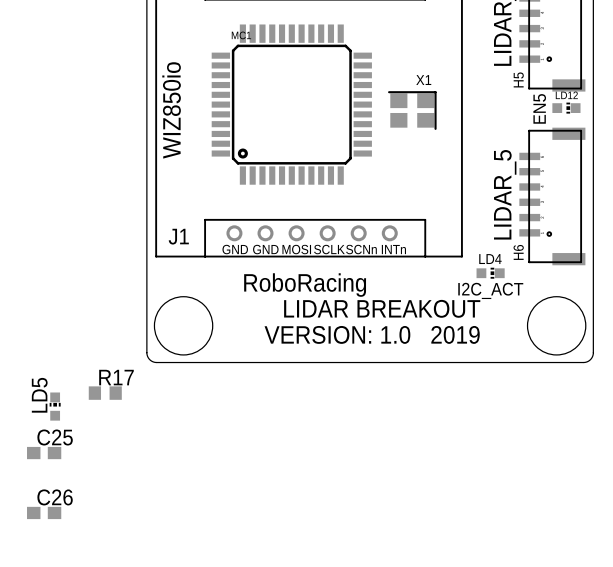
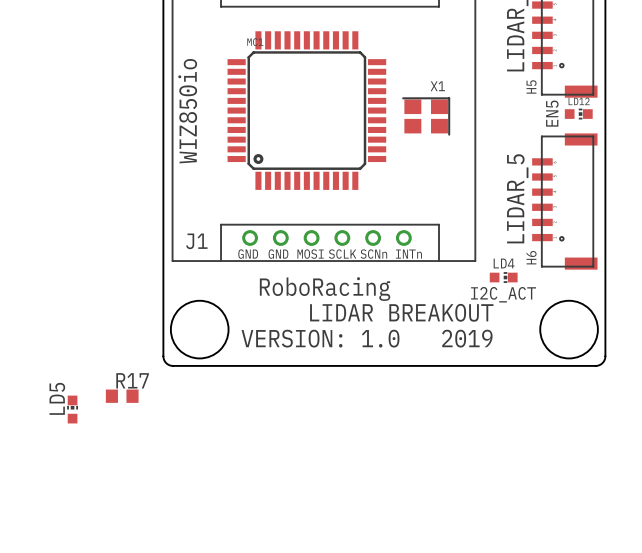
C25: (44, 453) -> none
C26: (44, 512) -> none

